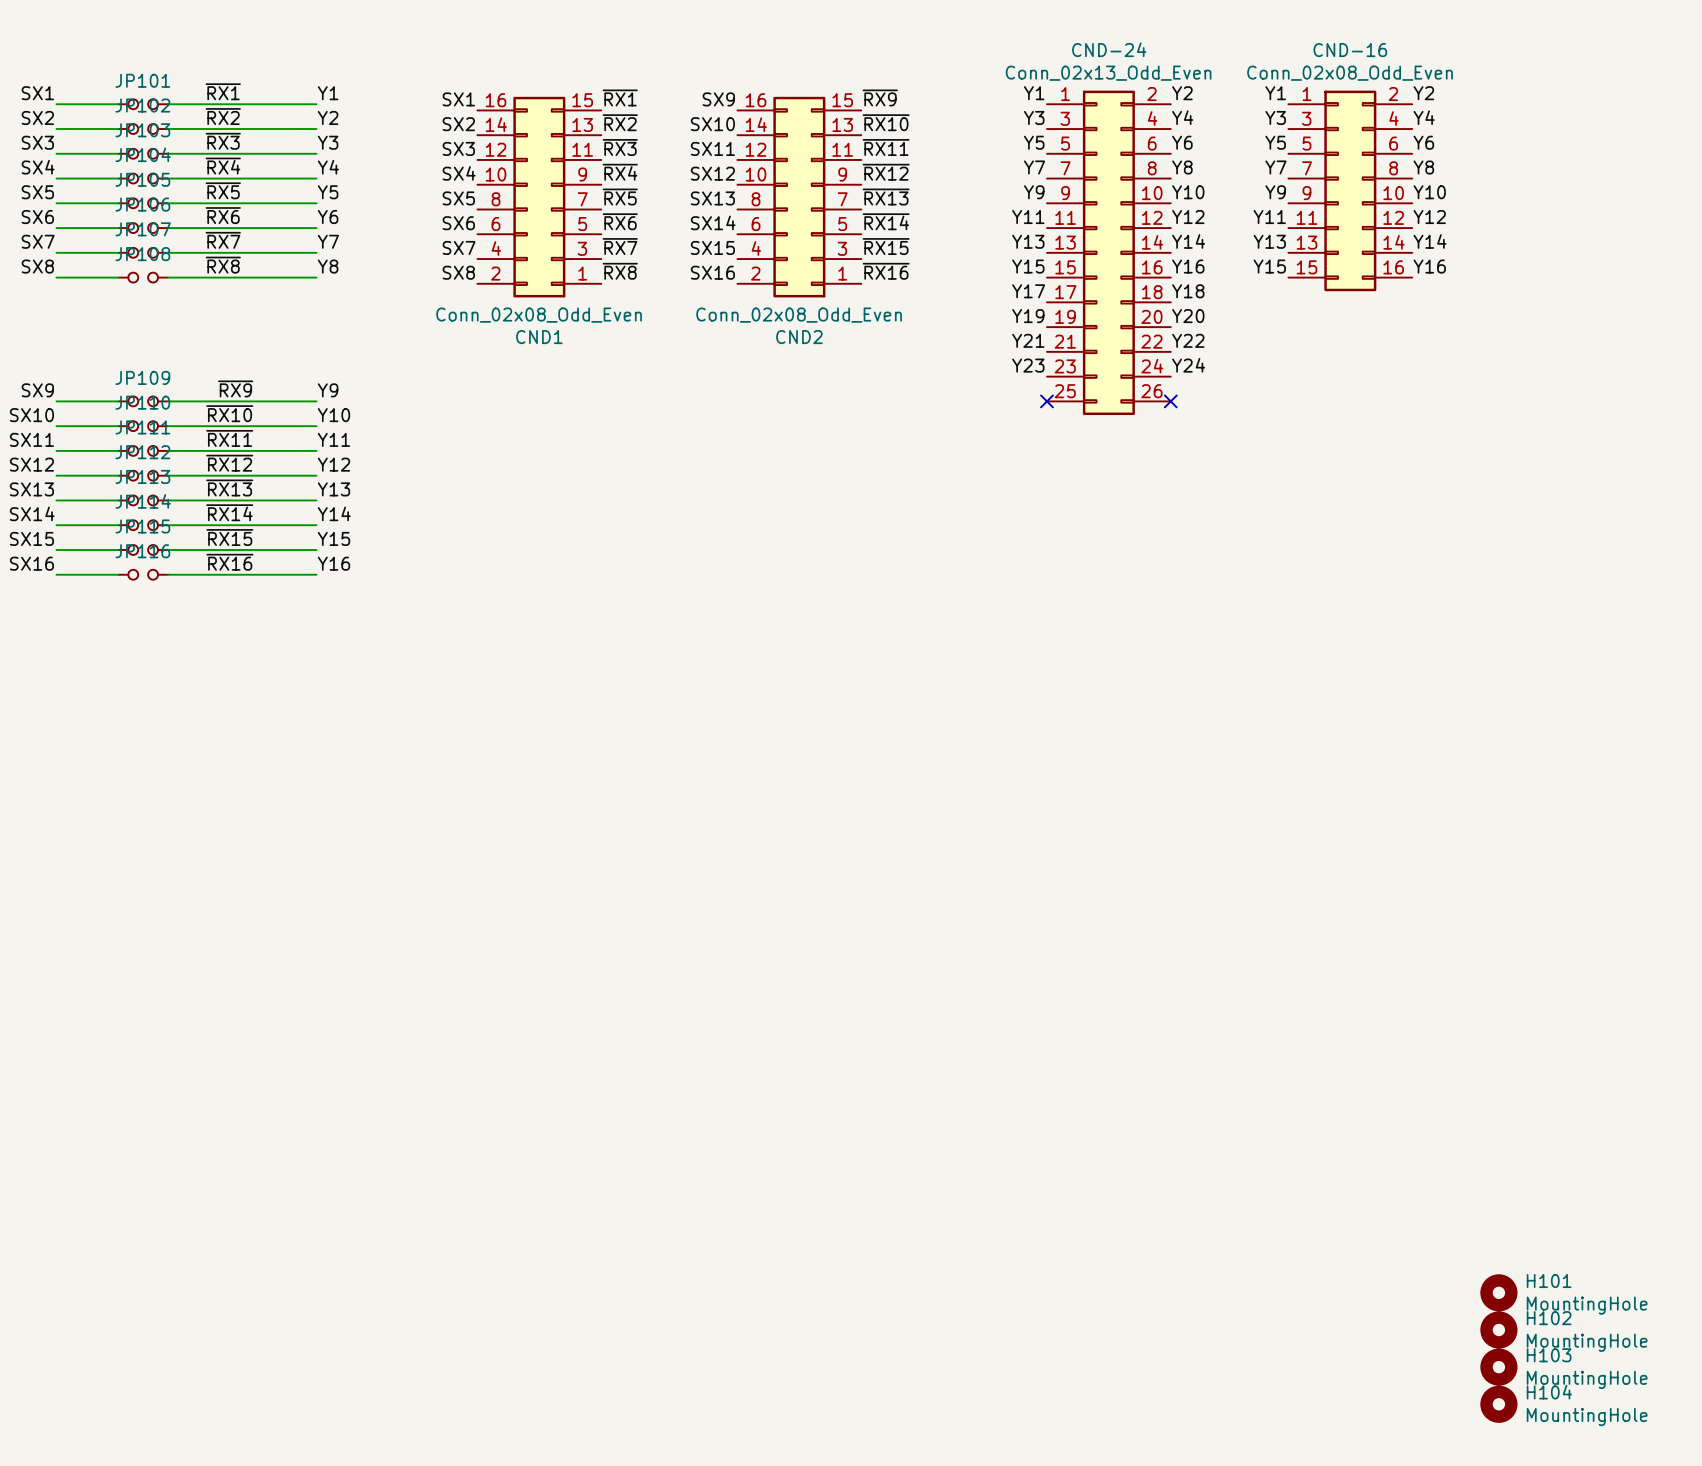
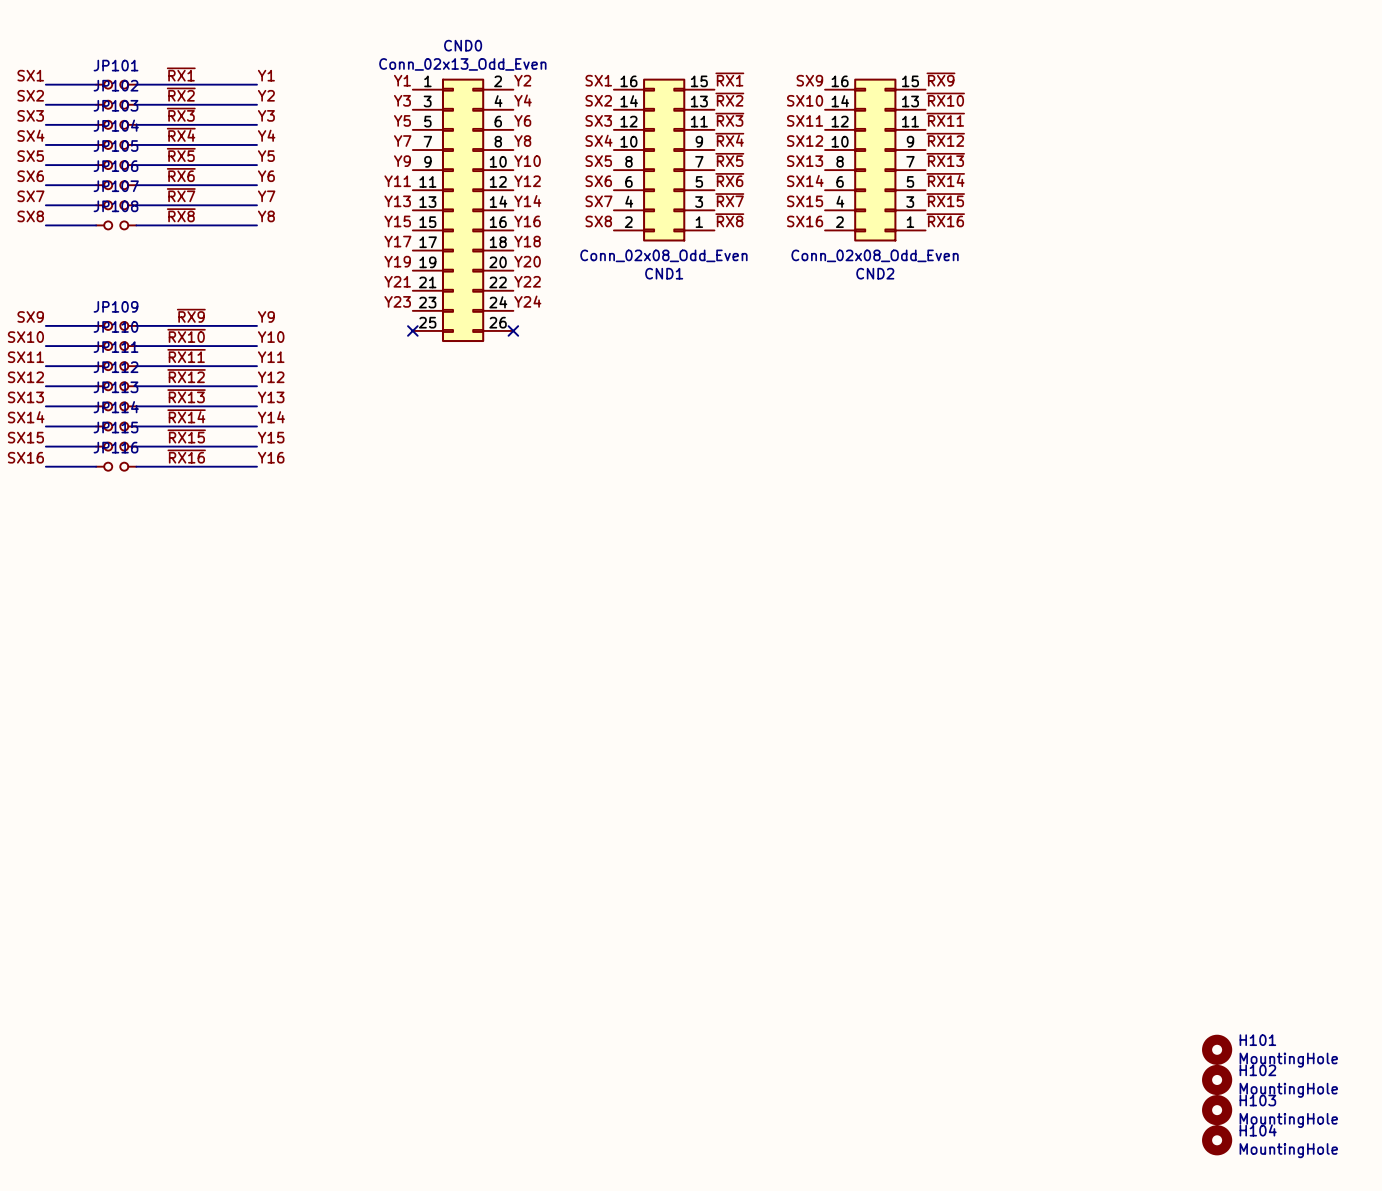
label: Y1 (1034, 93) -> none
label: Y2 (1182, 93) -> none
label: Y1 (1275, 93) -> none
label: Y2 (1423, 93) -> none
label: ~{RX1} (620, 97) -> none
label: ~{RX9} (880, 97) -> none
label: none -> ~{RX1} (729, 79)
label: none -> ~{RX9} (940, 79)
label: SX1 (458, 99) -> none
label: none -> Y1 (402, 80)
label: none -> Y2 (522, 80)
label: SX9 (718, 99) -> none
label: none -> SX1 (598, 80)
label: none -> SX9 (809, 80)
label: Y3 (1034, 117) -> none
label: Y4 (1182, 117) -> none
label: Y3 (1275, 117) -> none
label: Y4 (1424, 117) -> none
label: ~{RX2} (620, 122) -> none
label: ~{RX10} (886, 122) -> none
label: none -> ~{RX2} (729, 99)
label: none -> ~{RX10} (945, 99)
label: none -> Y4 (523, 100)
label: SX2 (458, 124) -> none
label: none -> Y3 (402, 100)
label: SX10 (712, 124) -> none
label: none -> SX2 (598, 100)
label: none -> SX10 (805, 100)
label: Y5 (1034, 142) -> none
label: Y6 (1182, 142) -> none
label: Y5 (1275, 142) -> none
label: Y6 (1423, 142) -> none
label: ~{RX3} (620, 147) -> none
label: ~{RX11} (886, 147) -> none
label: none -> ~{RX3} (729, 119)
label: none -> ~{RX11} (945, 119)
label: SX3 (458, 148) -> none
label: none -> Y5 (402, 120)
label: none -> Y6 (522, 120)
label: SX11 (712, 148) -> none
label: none -> SX3 (598, 120)
label: none -> SX11 (805, 120)
label: Y7 (1034, 167) -> none
label: Y8 (1182, 167) -> none
label: Y7 (1275, 167) -> none
label: Y8 (1423, 167) -> none
label: ~{RX4} (620, 172) -> none
label: ~{RX12} (886, 172) -> none
label: none -> ~{RX4} (729, 139)
label: none -> ~{RX12} (945, 139)
label: SX4 (459, 173) -> none
label: none -> Y7 (402, 141)
label: none -> Y8 (522, 141)
label: SX12 (712, 173) -> none
label: none -> SX4 (598, 140)
label: none -> SX12 (805, 141)
CND-16: Conn_02x08_Odd_Even (1350, 190) -> none
label: Y9 (1034, 192) -> none
label: Y10 (1188, 192) -> none
label: Y9 (1275, 192) -> none
label: Y10 (1429, 192) -> none
CND1 position: (539, 197) -> (664, 160)
label: ~{RX5} (620, 197) -> none
CND2 position: (799, 197) -> (875, 160)
label: ~{RX13} (886, 197) -> none
label: none -> ~{RX5} (729, 159)
label: none -> ~{RX13} (945, 159)
label: SX5 (458, 198) -> none
label: none -> Y9 (402, 161)
label: none -> Y10 (527, 161)
label: SX13 (712, 198) -> none
label: none -> SX5 (598, 161)
label: none -> SX13 (805, 161)
label: Y11 (1028, 217) -> none
label: Y12 (1188, 217) -> none
label: Y11 (1269, 217) -> none
label: Y12 (1429, 217) -> none
label: ~{RX6} (620, 221) -> none
label: ~{RX14} (886, 221) -> none
label: none -> ~{RX6} (729, 180)
label: none -> ~{RX14} (945, 180)
label: SX14 (713, 222) -> none
label: none -> SX14 (805, 181)
label: SX6 (458, 223) -> none
label: none -> Y11 (397, 181)
label: none -> Y12 (527, 181)
label: none -> SX6 (598, 181)
label: Y13 (1028, 241) -> none
label: Y14 (1188, 241) -> none
label: Y13 (1269, 241) -> none
label: Y14 (1430, 241) -> none
label: ~{RX7} (620, 246) -> none
label: ~{RX15} (886, 246) -> none
label: none -> ~{RX7} (729, 200)
label: none -> ~{RX15} (945, 200)
label: SX7 (459, 247) -> none
label: none -> Y13 (397, 201)
label: none -> Y14 (527, 201)
label: SX15 (712, 247) -> none
label: none -> SX7 (598, 201)
label: none -> SX15 (805, 201)
CND-24: Conn_02x13_Odd_Even (1108, 252) -> none
CND0: none -> Conn_02x13_Odd_Even (463, 210)
label: Y15 (1028, 266) -> none
label: Y16 (1188, 266) -> none
label: Y15 (1269, 266) -> none
label: Y16 (1429, 266) -> none
label: ~{RX8} (620, 271) -> none
label: ~{RX16} (886, 271) -> none
label: none -> ~{RX8} (729, 220)
label: none -> ~{RX16} (945, 220)
label: SX8 (458, 272) -> none
label: none -> Y15 (397, 221)
label: none -> Y16 (527, 221)
label: SX16 (712, 272) -> none
label: none -> SX8 (598, 221)
label: none -> SX16 (805, 221)
label: Y17 (1028, 291) -> none
label: Y18 (1188, 291) -> none
label: none -> Y17 (397, 241)
label: none -> Y18 (527, 241)
label: Y19 (1028, 316) -> none
label: Y20 (1188, 316) -> none
label: none -> Y19 (397, 261)
label: none -> Y20 (527, 261)
label: Y21 (1028, 340) -> none
label: Y22 (1188, 340) -> none
label: none -> Y21 (397, 281)
label: none -> Y22 (527, 281)
label: Y23 (1028, 365) -> none
label: Y24 (1188, 365) -> none
label: none -> Y23 (397, 301)
label: none -> Y24 (527, 301)
no-connect mark: (1046, 401) -> none
no-connect mark: (1170, 401) -> none
no-connect mark: none -> (412, 330)
no-connect mark: none -> (513, 330)

